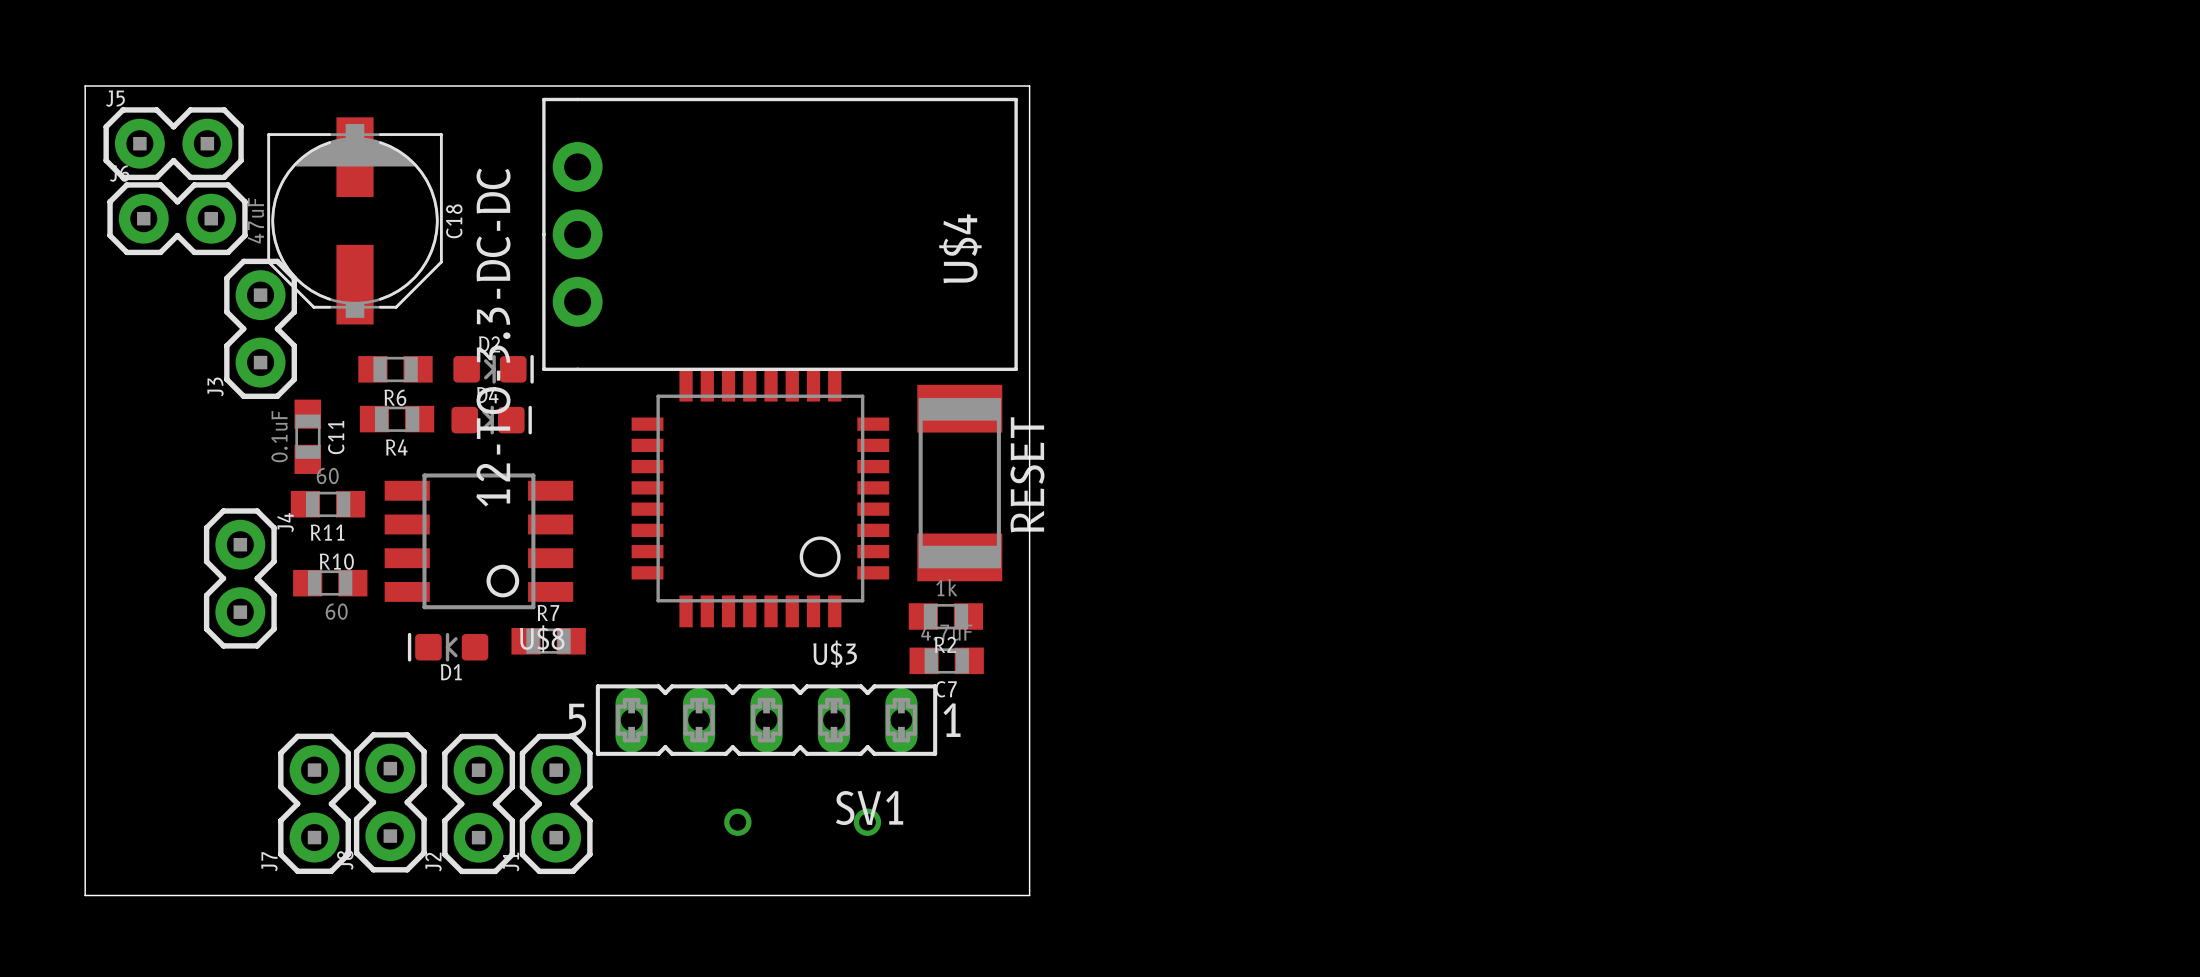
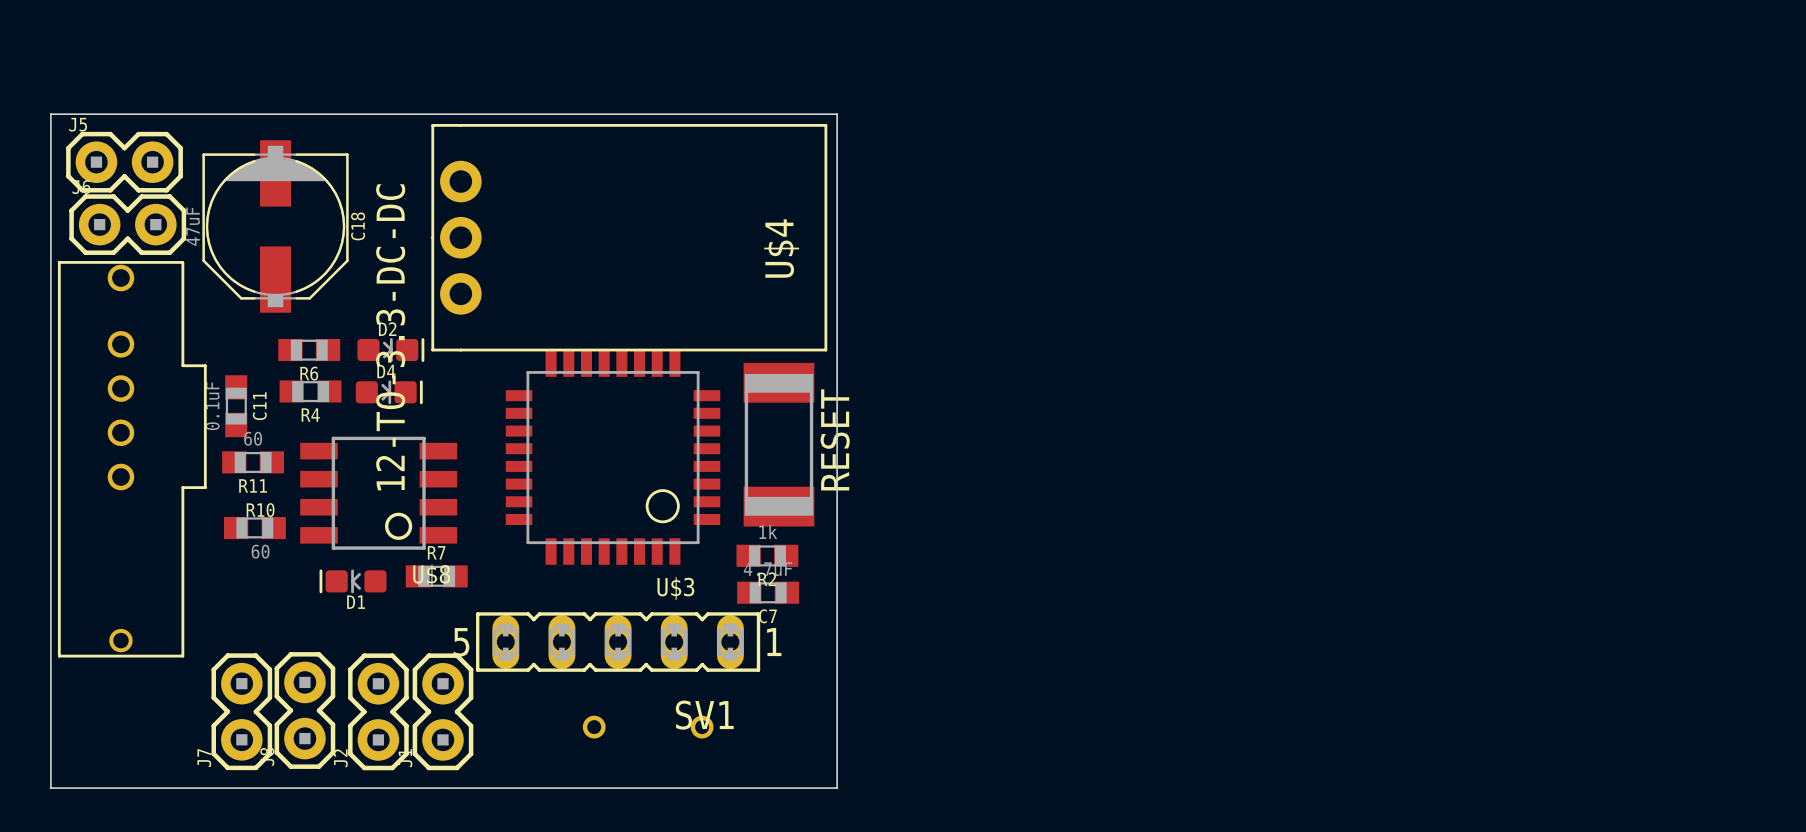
J3: (260, 328) -> none
part: none -> (132, 459)
J4: (240, 578) -> none

